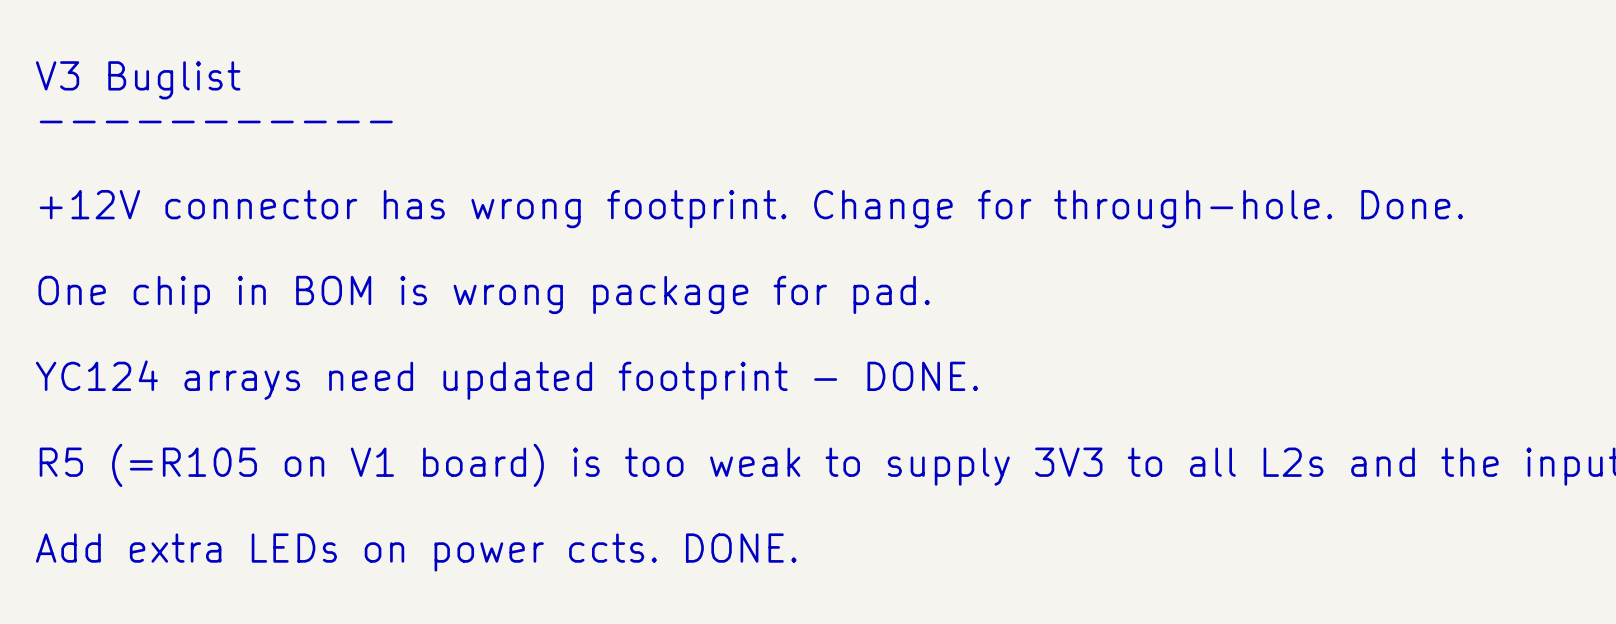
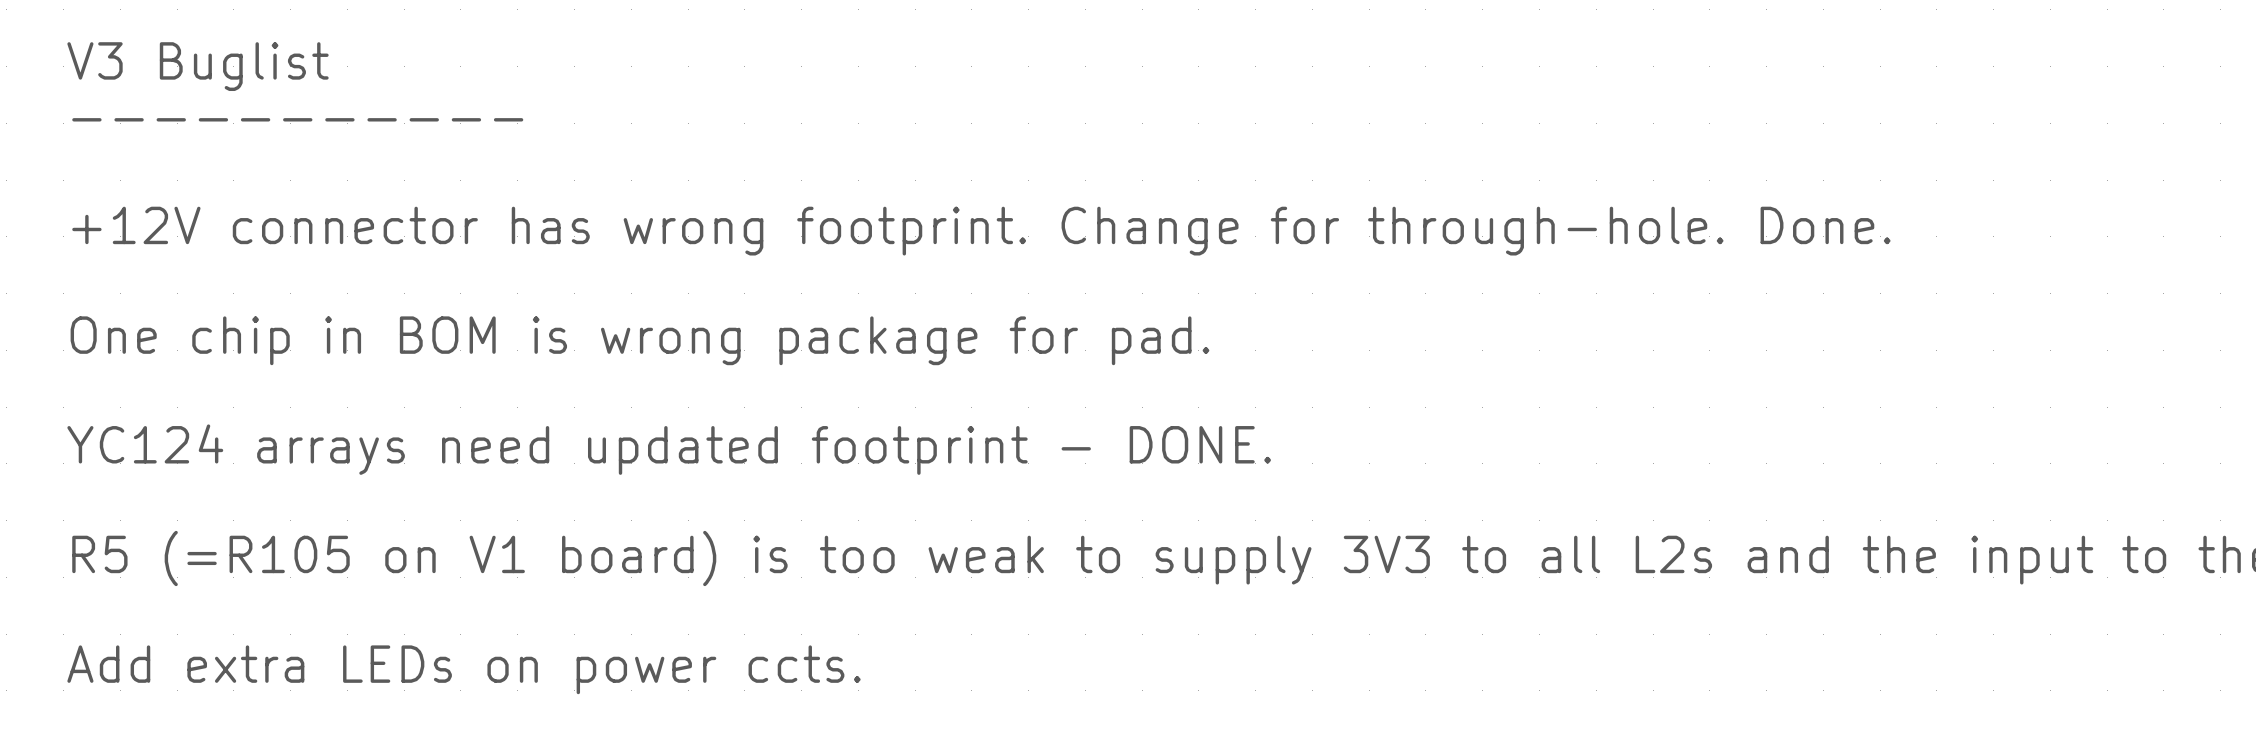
text: Add extra LEDs on power ccts. DONE. (416, 552) -> Add extra LEDs on power ccts. (463, 669)

